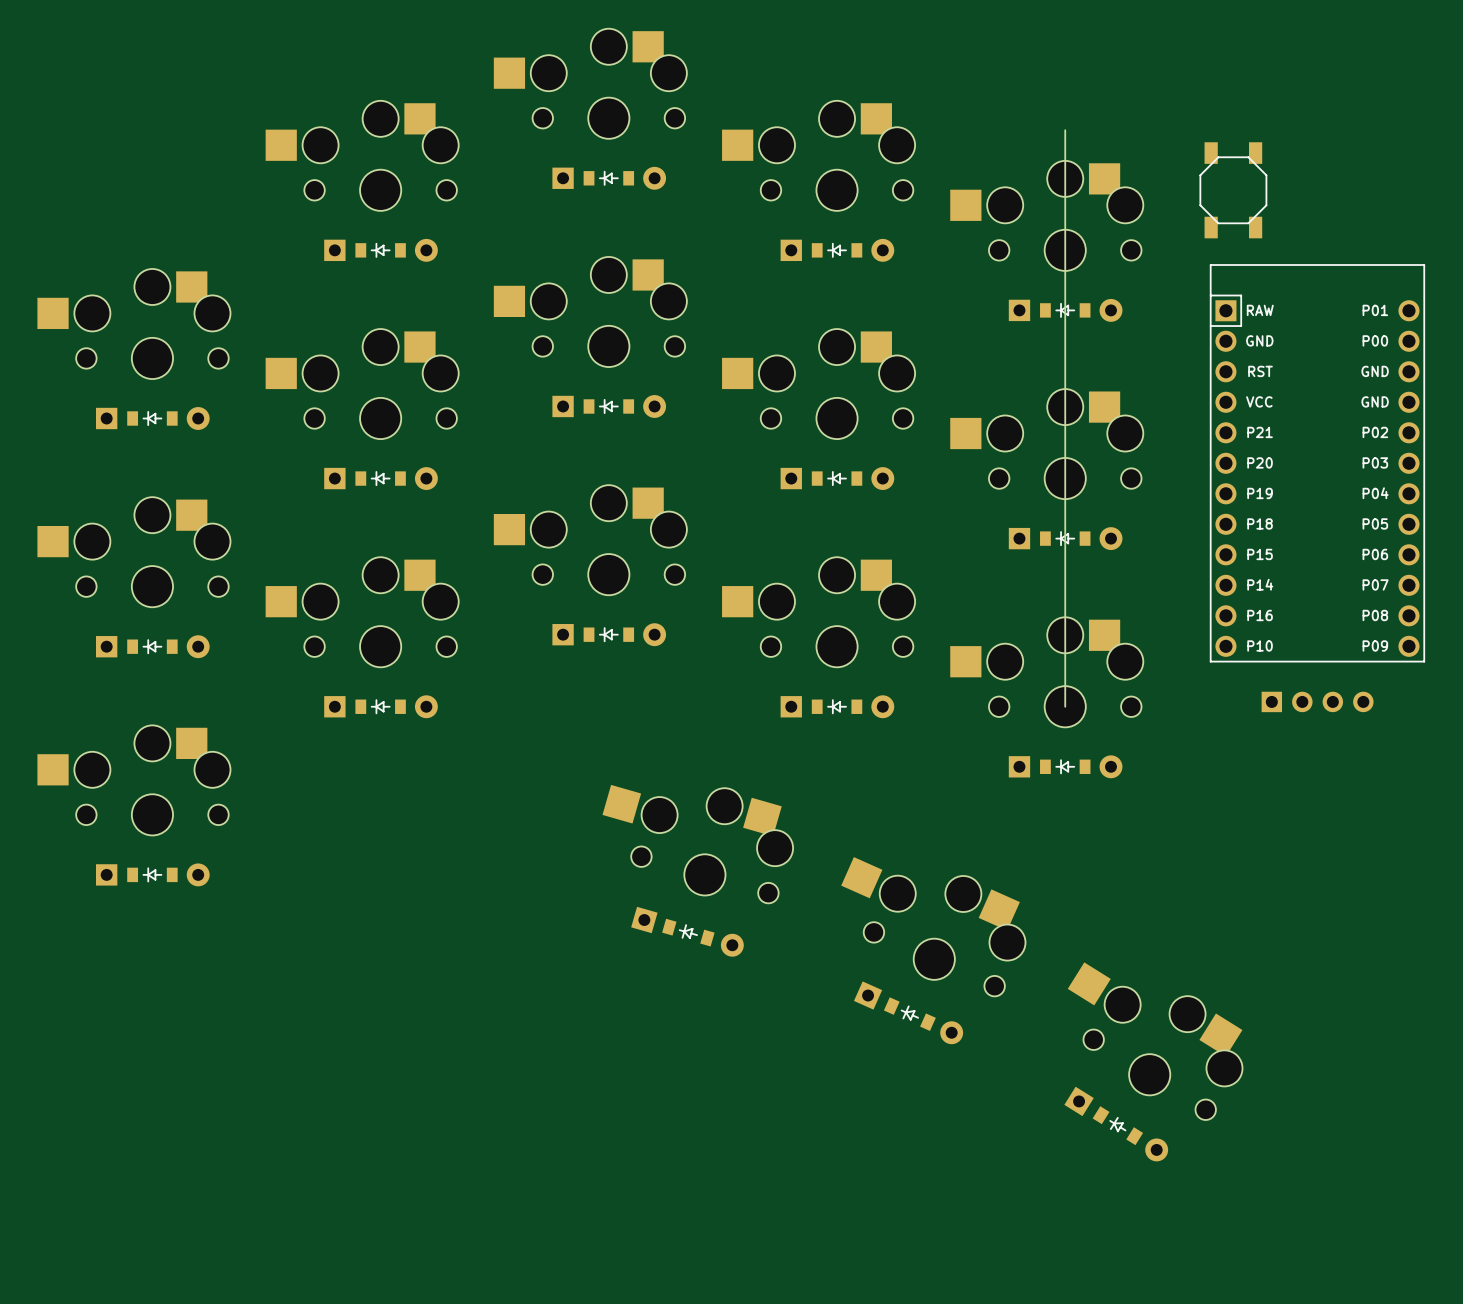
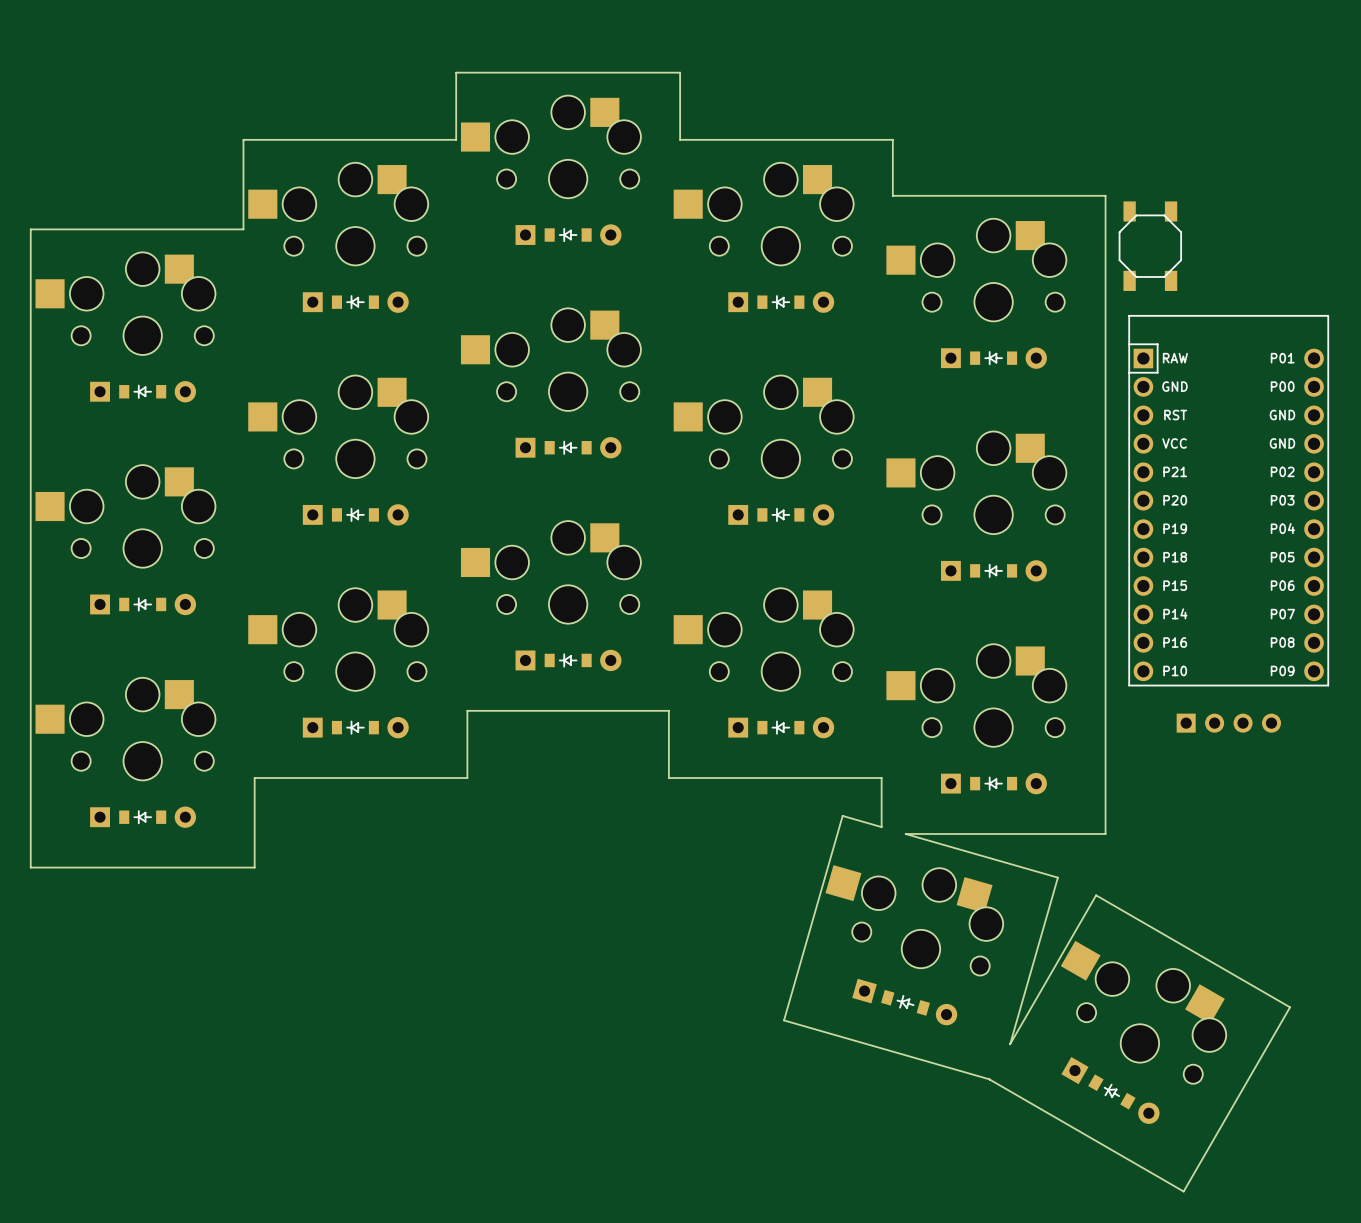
part position: (590, 83) -> (550, 146)
board edge: (1065, 130) (1065, 706) -> none
part position: (362, 155) -> (338, 214)
part position: (818, 155) -> (763, 214)
part position: (609, 178) -> (568, 235)
part position: (1233, 190) -> (1150, 246)
part position: (1046, 215) -> (976, 270)
part position: (381, 250) -> (355, 302)
part position: (837, 250) -> (781, 302)
part position: (1065, 310) -> (993, 358)
part position: (590, 311) -> (550, 359)
part position: (362, 384) -> (338, 426)
part position: (818, 384) -> (763, 426)
part position: (609, 406) -> (568, 447)
part position: (1046, 444) -> (976, 482)
part position: (1317, 463) -> (1228, 500)
part position: (381, 478) -> (355, 514)
part position: (837, 478) -> (781, 514)
part position: (1065, 538) -> (993, 570)
part position: (590, 540) -> (550, 572)
part position: (362, 612) -> (338, 639)
part position: (818, 612) -> (763, 639)
part position: (609, 634) -> (568, 660)
part position: (1046, 672) -> (976, 695)
part position: (1317, 701) -> (1228, 723)
part position: (381, 706) -> (355, 727)
part position: (837, 706) -> (781, 727)
part position: (1065, 766) -> (993, 783)
part: (697, 844) -> none
part: (933, 926) -> none
part: (687, 931) -> none
part: none -> (914, 920)
part: (908, 1012) -> none
part: (1155, 1041) -> none
part: none -> (904, 1002)
part: none -> (1143, 1012)
part: (1116, 1124) -> none
board edge: none -> (989, 1079) (784, 1020) (842, 815) (881, 827) (881, 778) (668, 778) (668, 710) (467, 710) (467, 778) (254, 778) (254, 867) (30, 867) (30, 229) (243, 229) (243, 139) (456, 139) (456, 72) (680, 72) (680, 139) (892, 139) (892, 195) (1105, 195) (1105, 833) (905, 833) (1057, 877) (1010, 1044) (1096, 895) (1290, 1007) (1183, 1191) (989, 1079)
part: none -> (1110, 1090)

